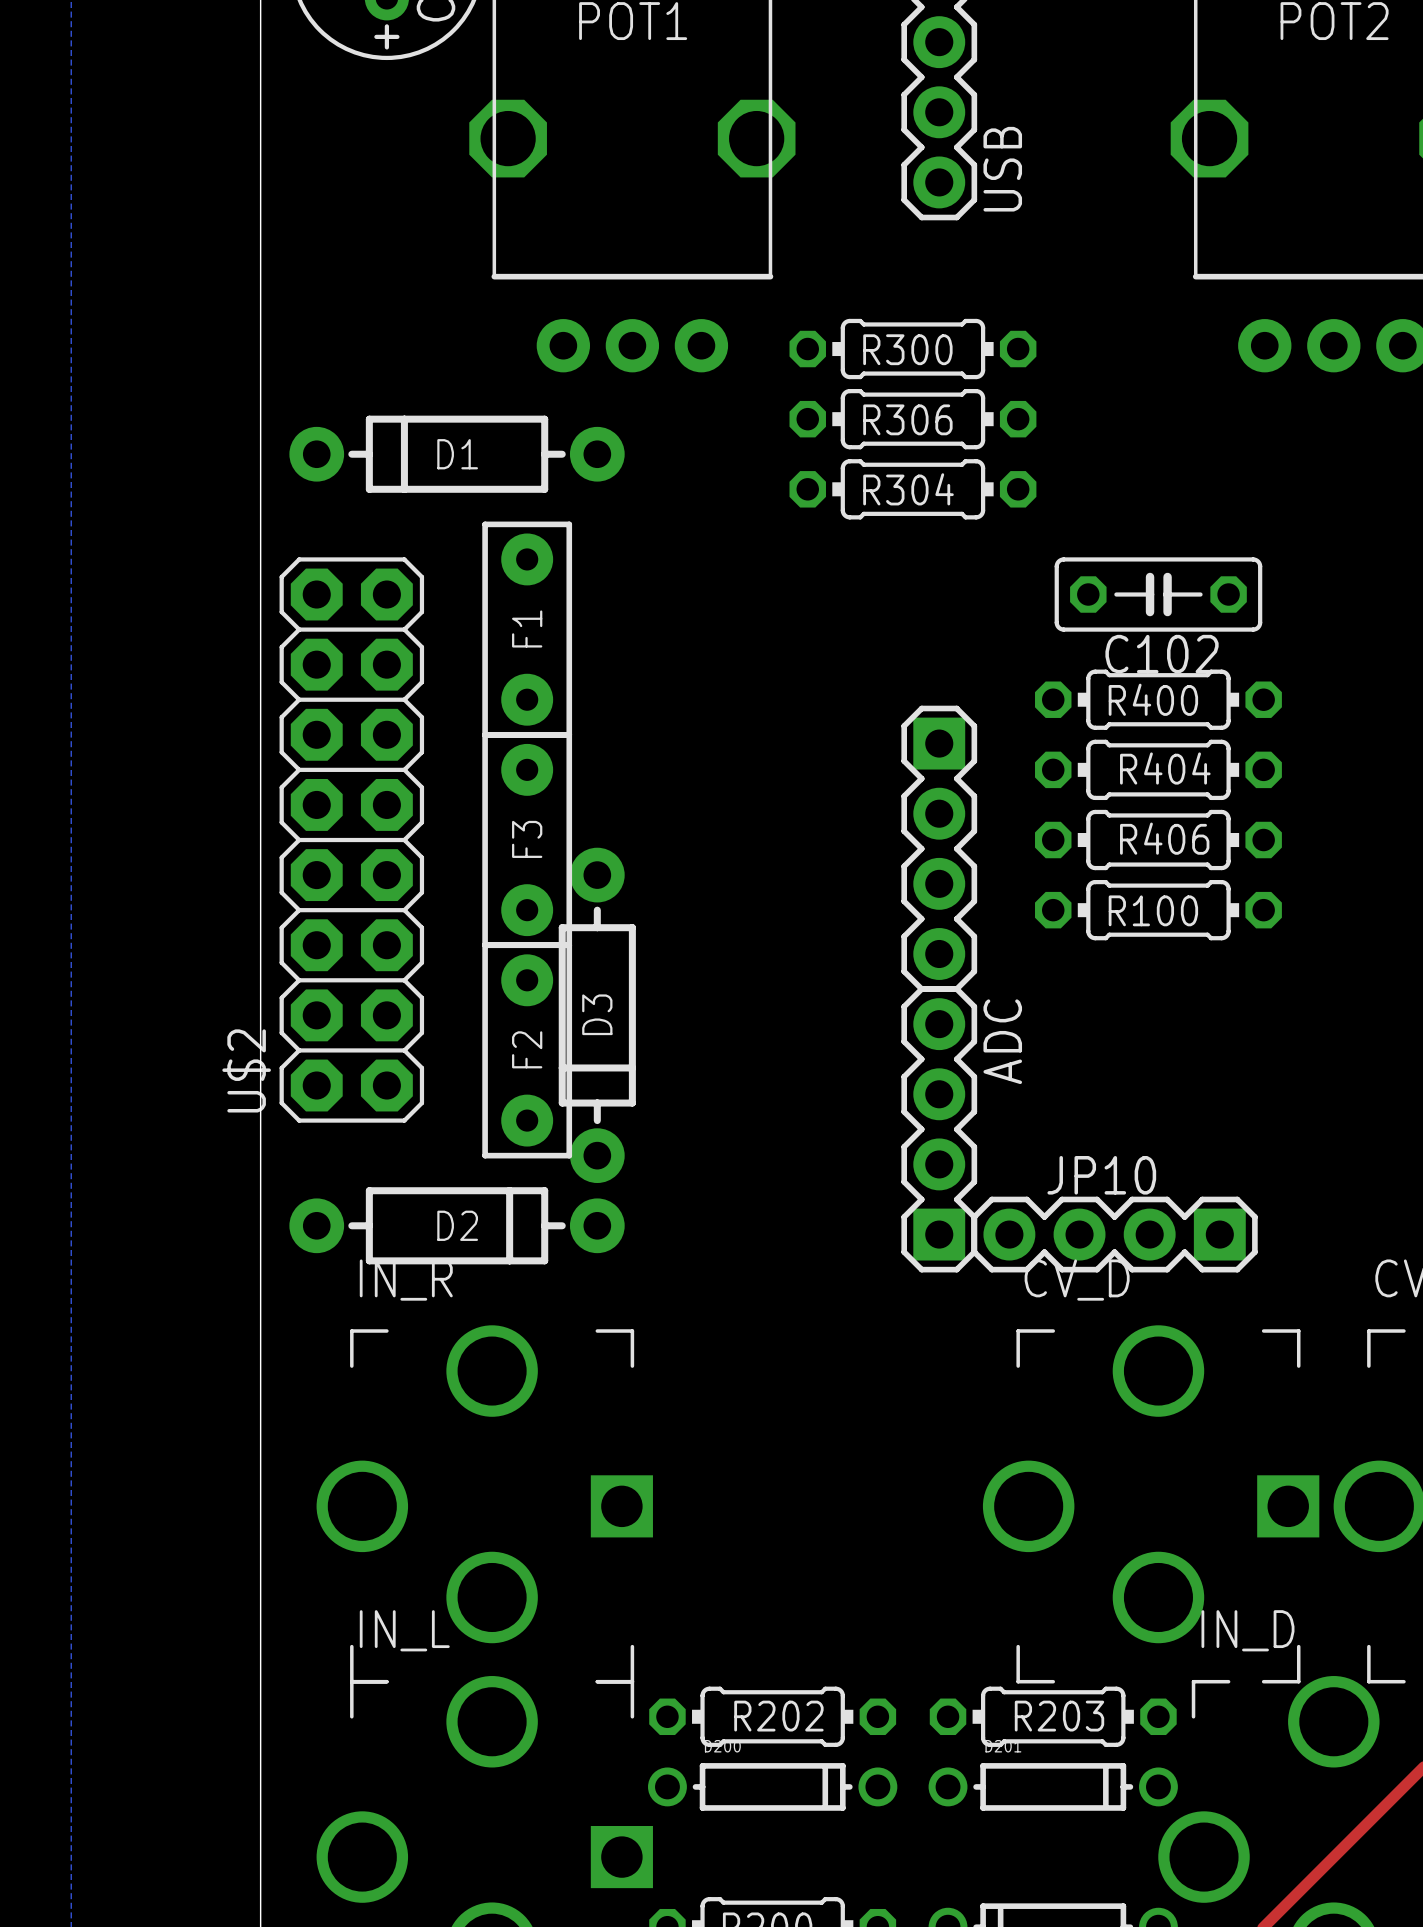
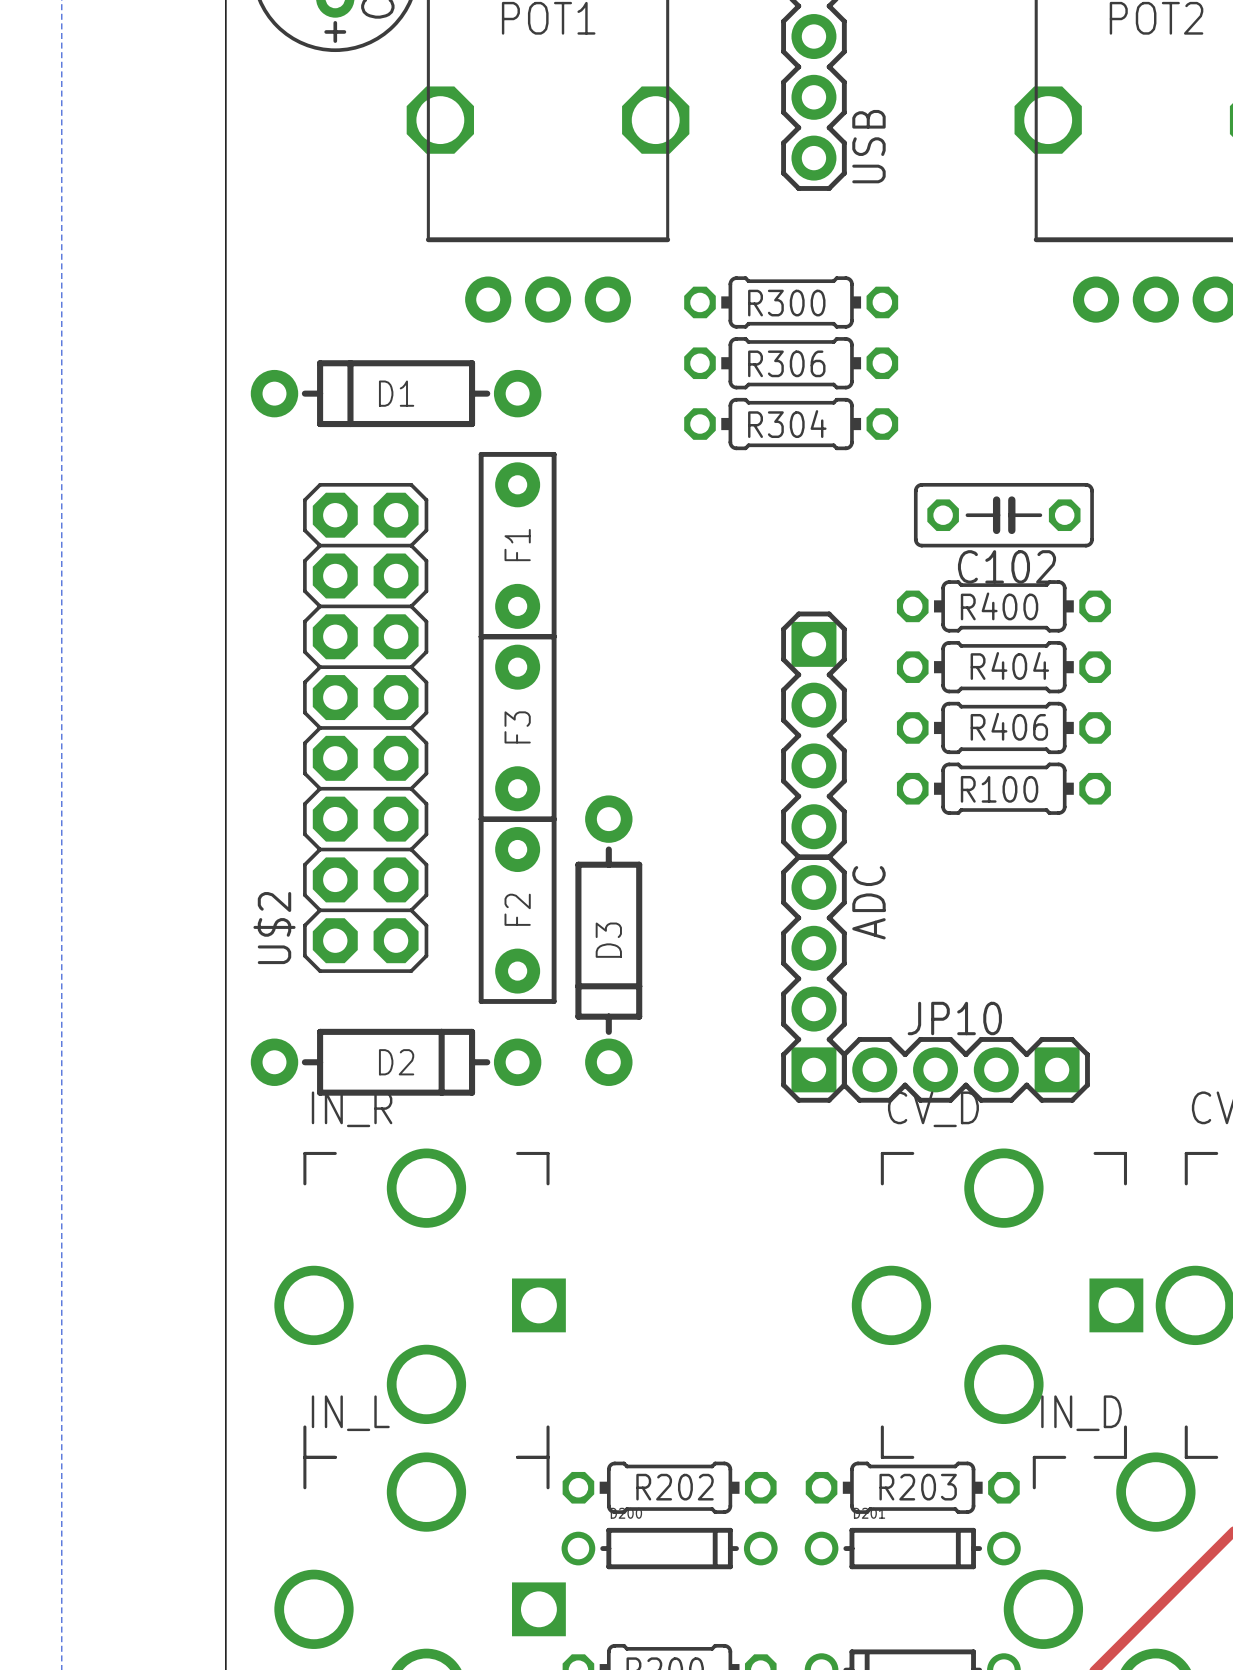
F1 position: (527, 629) -> (517, 545)
U$2 position: (351, 840) -> (365, 727)
F3 position: (527, 840) -> (517, 727)
D3 position: (597, 1015) -> (608, 940)
F2 position: (527, 1050) -> (517, 910)

